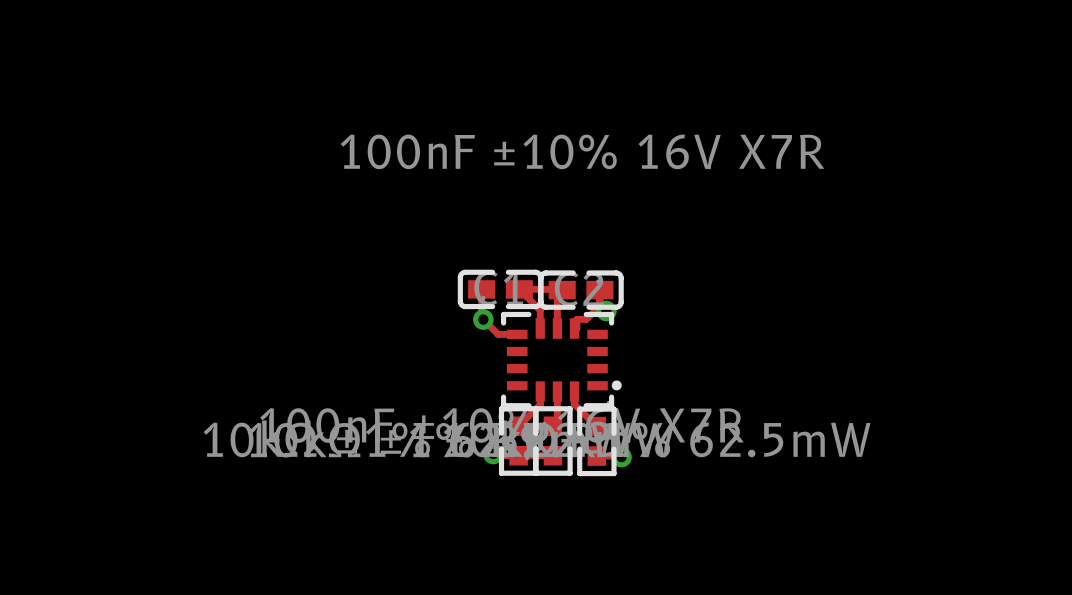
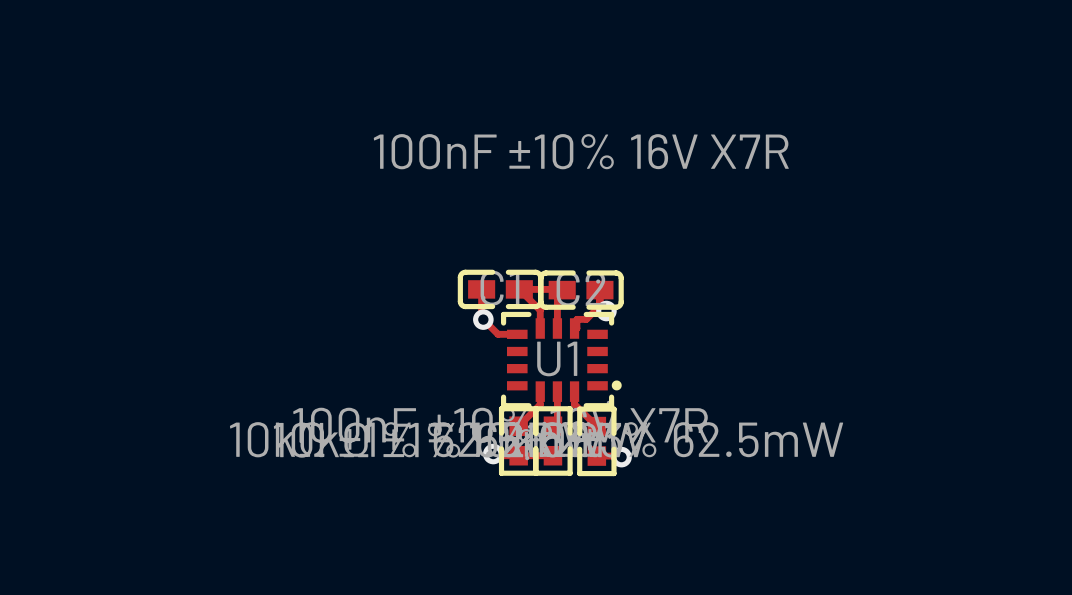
U1 name: none -> U1 (557, 358)

